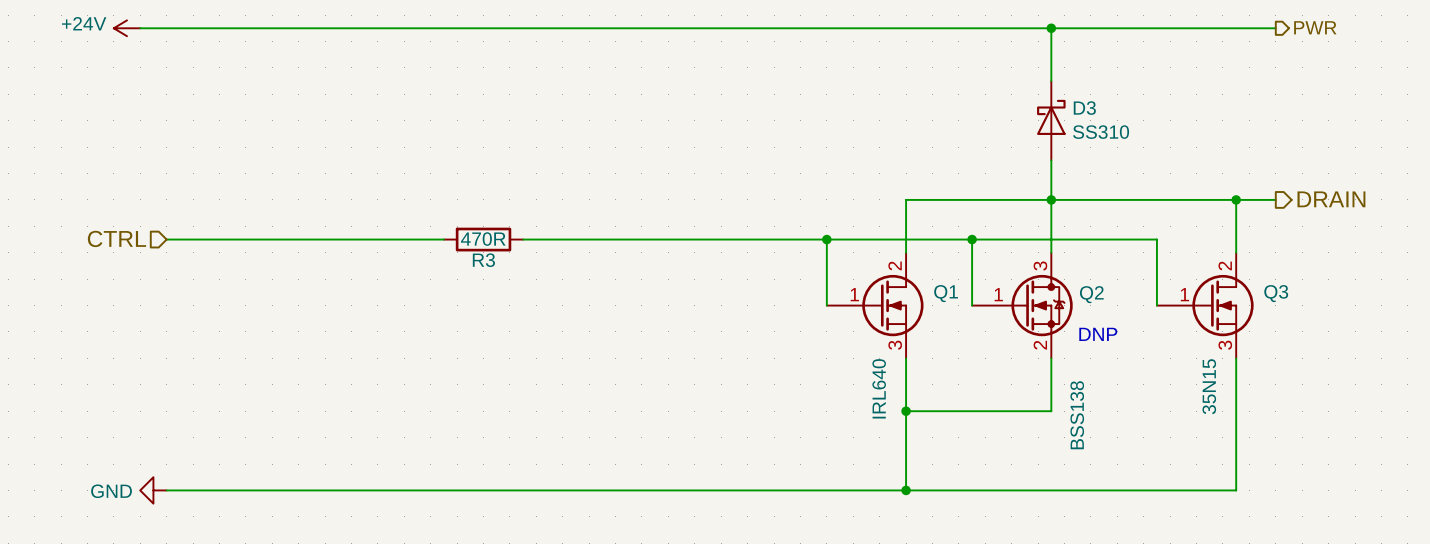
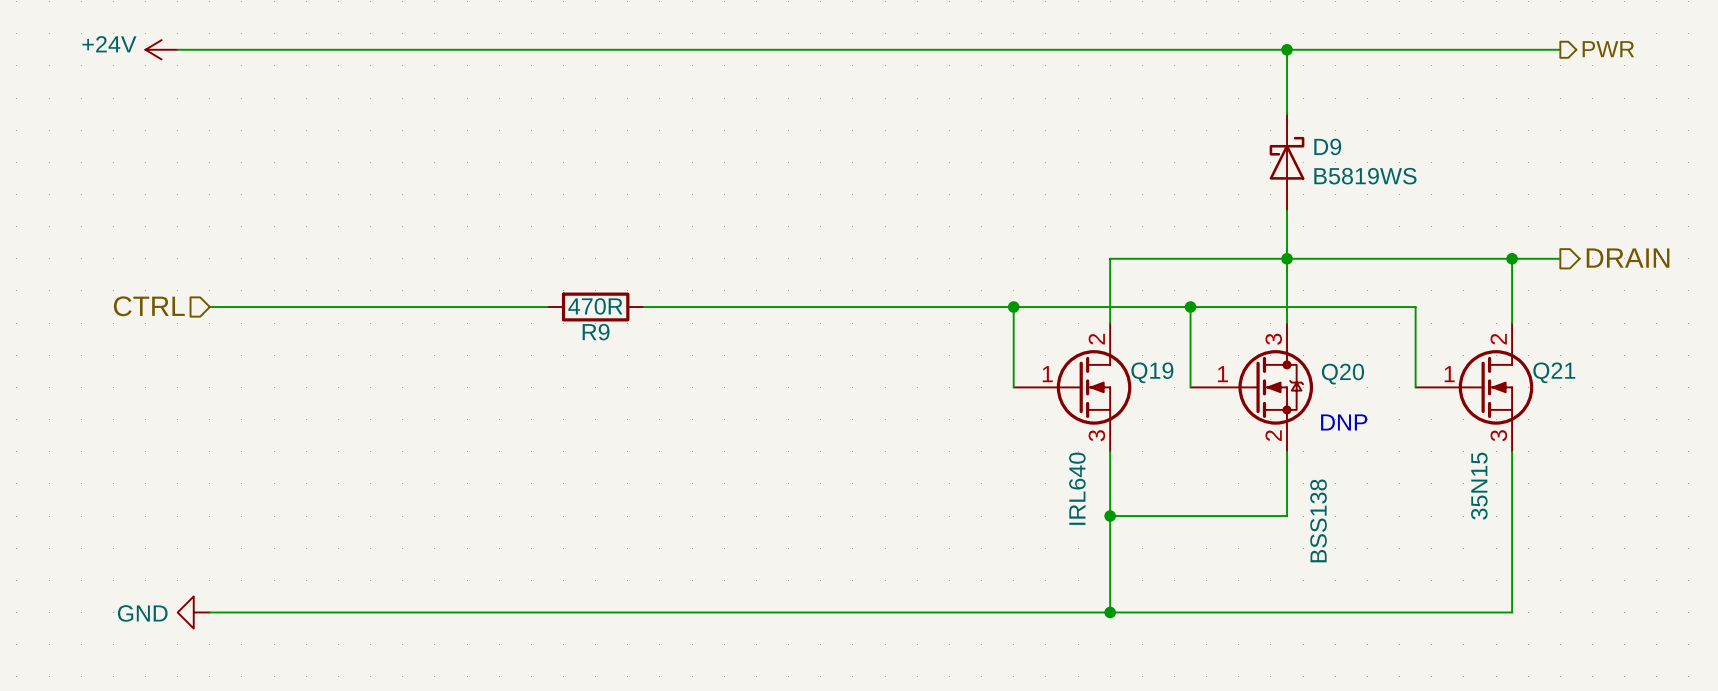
D3 name: D3 (1084, 108) -> D9 (1327, 146)
D3 value: SS310 (1101, 132) -> B5819WS (1365, 176)
R3 name: R3 (483, 260) -> R9 (596, 332)
Q1 name: Q1 (946, 293) -> Q19 (1152, 372)
Q3 name: Q3 (1276, 293) -> Q21 (1554, 372)
Q2 name: Q2 (1091, 294) -> Q20 (1342, 374)

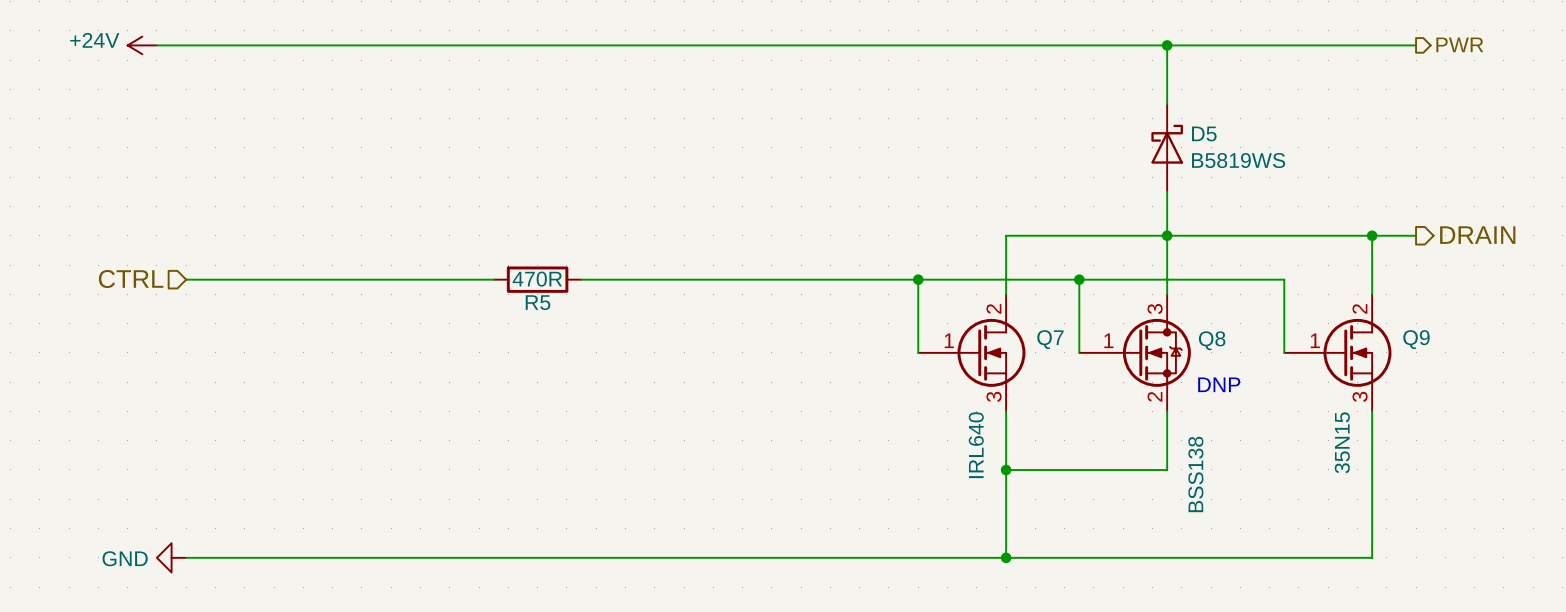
D9 name: D9 (1327, 146) -> D5 (1204, 133)
R9 name: R9 (596, 332) -> R5 (538, 302)
Q19 name: Q19 (1152, 372) -> Q7 (1050, 339)
Q21 name: Q21 (1554, 372) -> Q9 (1416, 339)
Q20 name: Q20 (1342, 374) -> Q8 (1212, 340)

